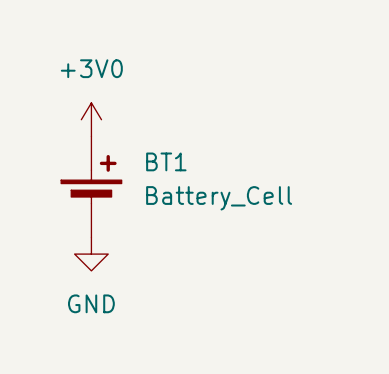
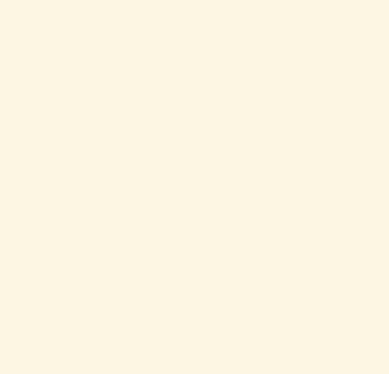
power symbol: +3V0 (91, 119) -> none
BT1: Battery_Cell (91, 186) -> none
power symbol: GND (91, 254) -> none

